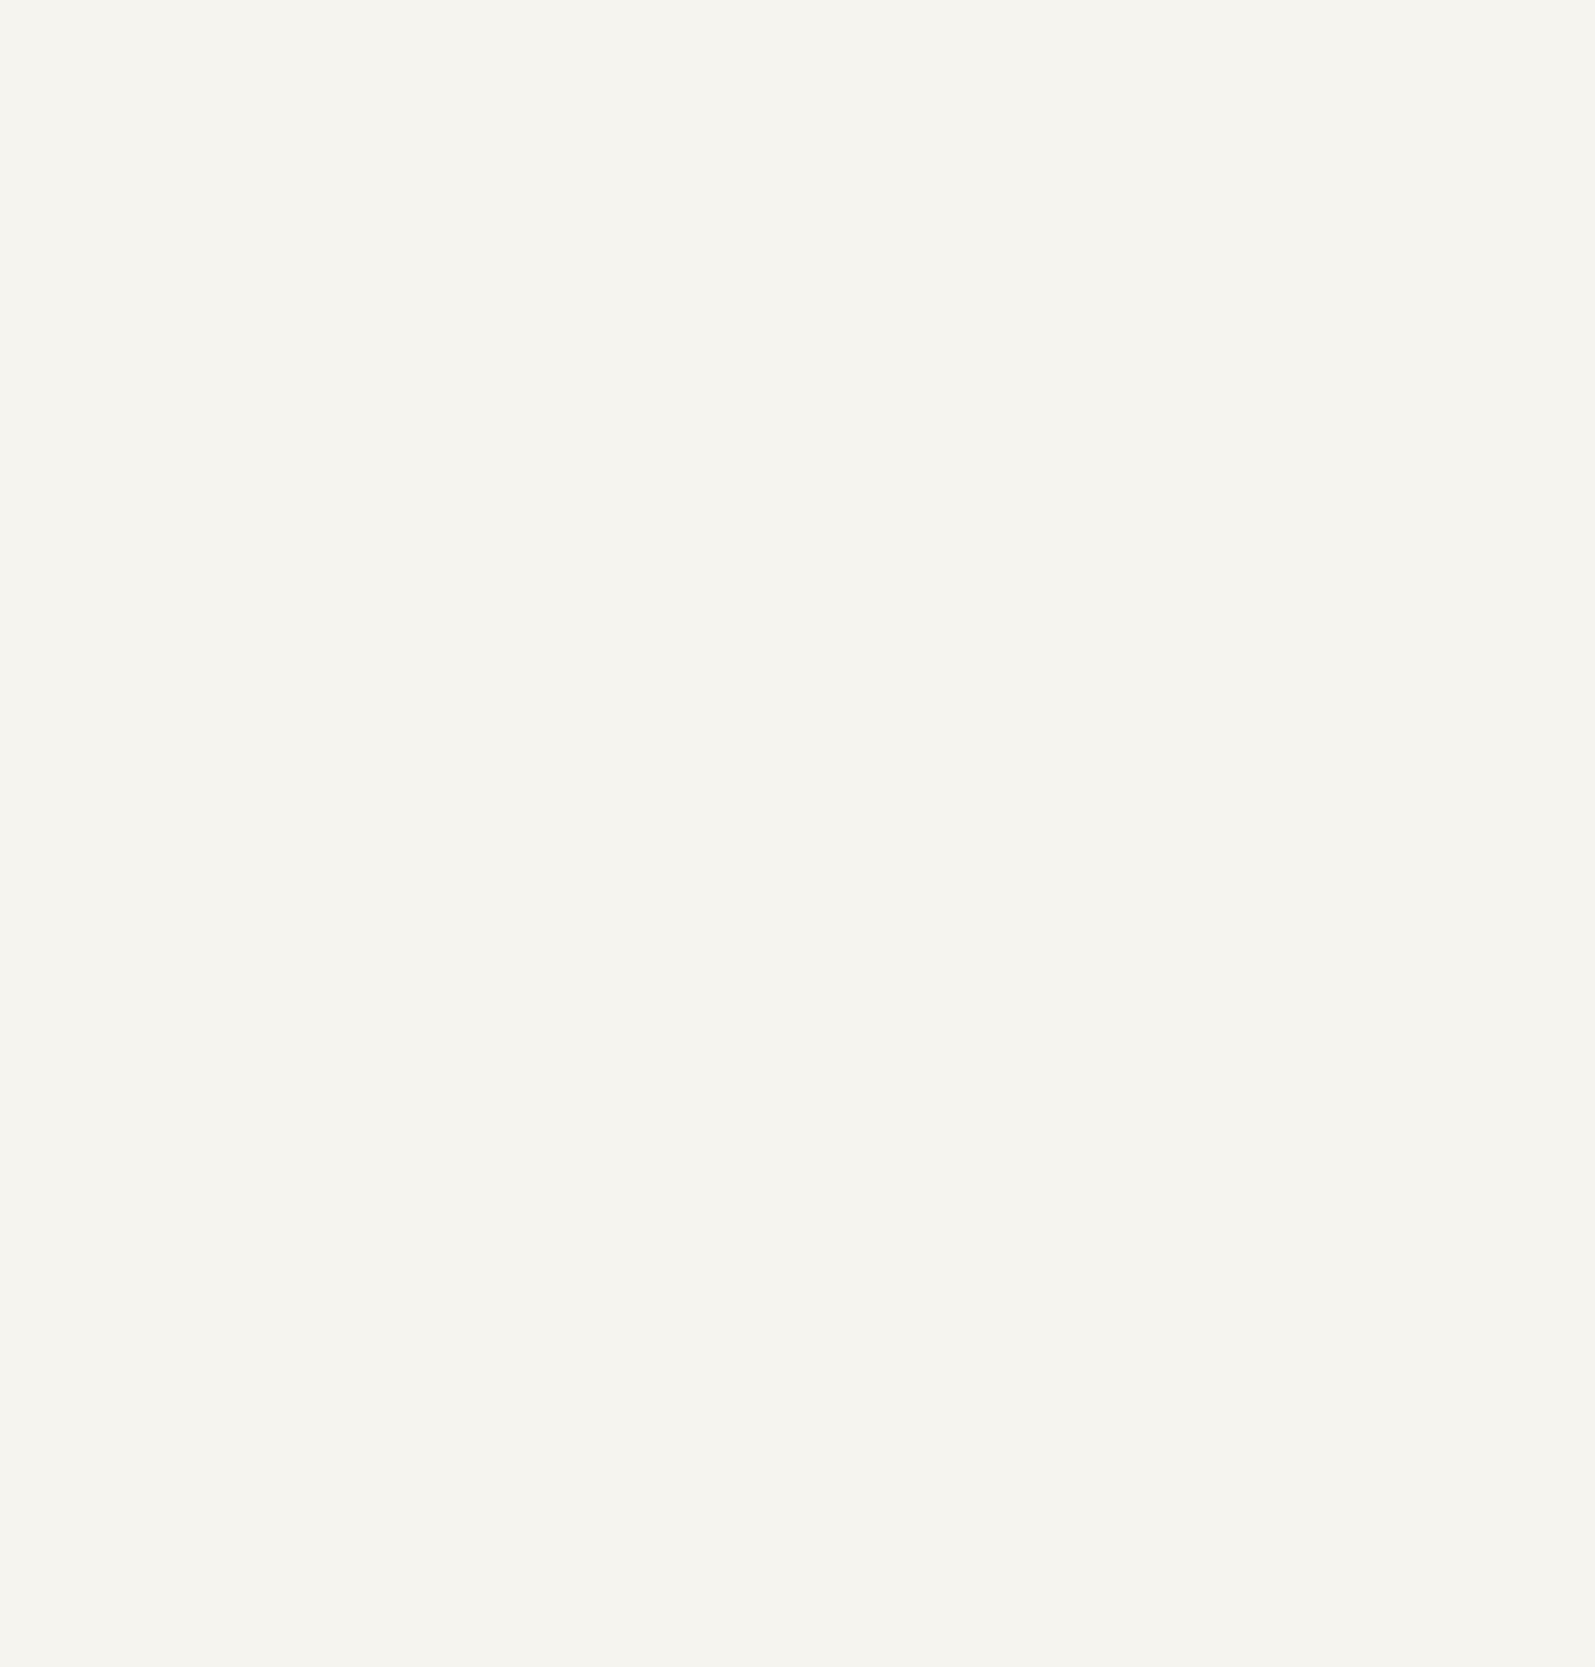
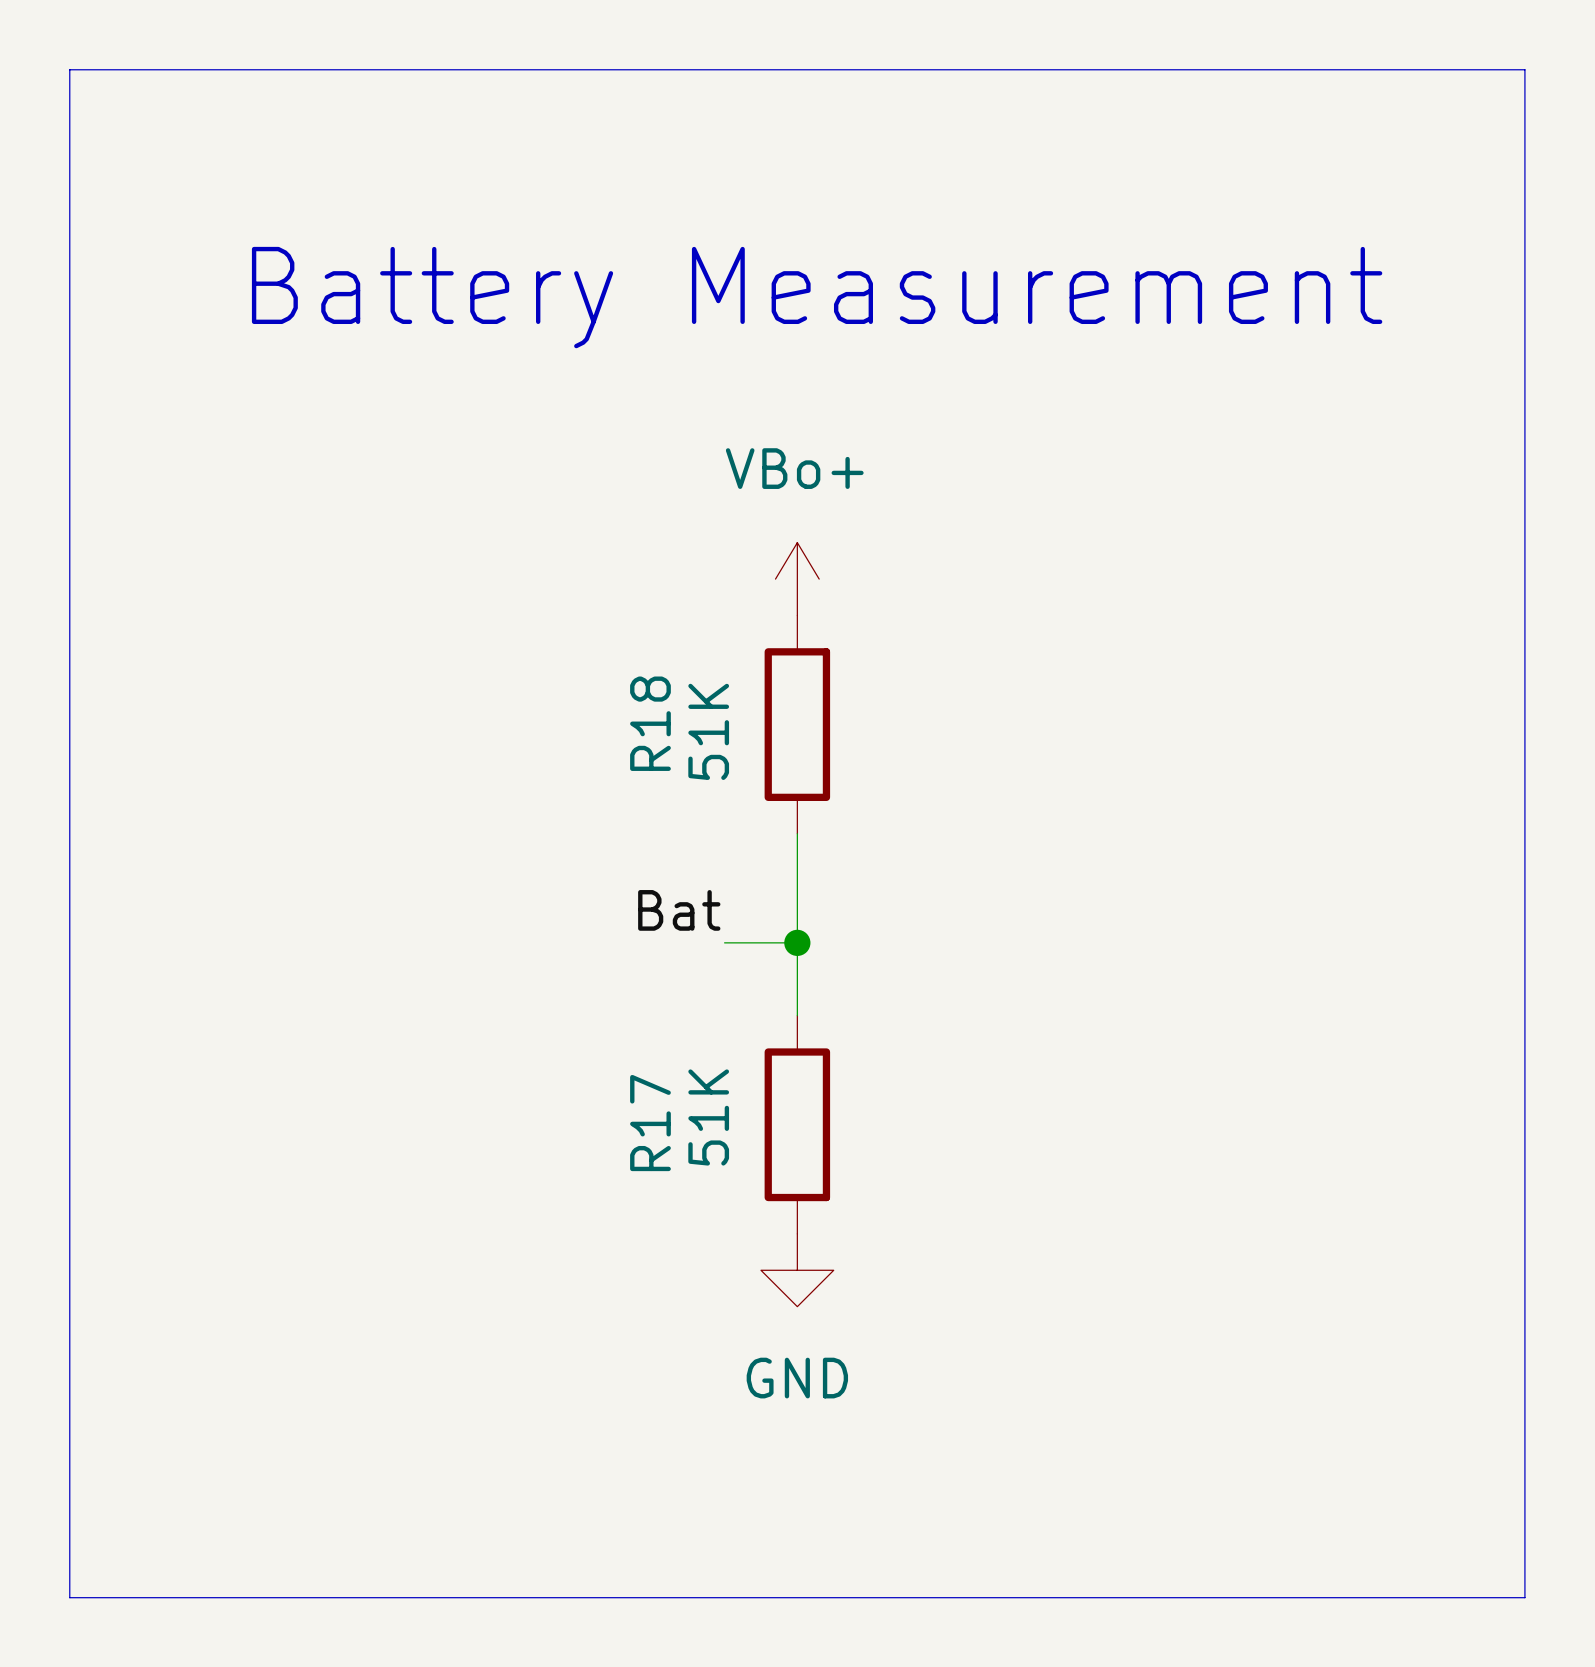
line: none -> (69, 69) (1524, 69) (1524, 1597) (69, 1597) (69, 69)
text: none -> Battery Measurement (817, 297)
power symbol: none -> VBo+ (797, 579)
R18: none -> 51K (797, 724)
wire: none -> (797, 833) (797, 1015)
label: none -> Bat (679, 910)
wire: none -> (724, 942) (797, 942)
junction: none -> (797, 942)
R17: none -> 51K (797, 1124)
power symbol: none -> GND (797, 1270)

